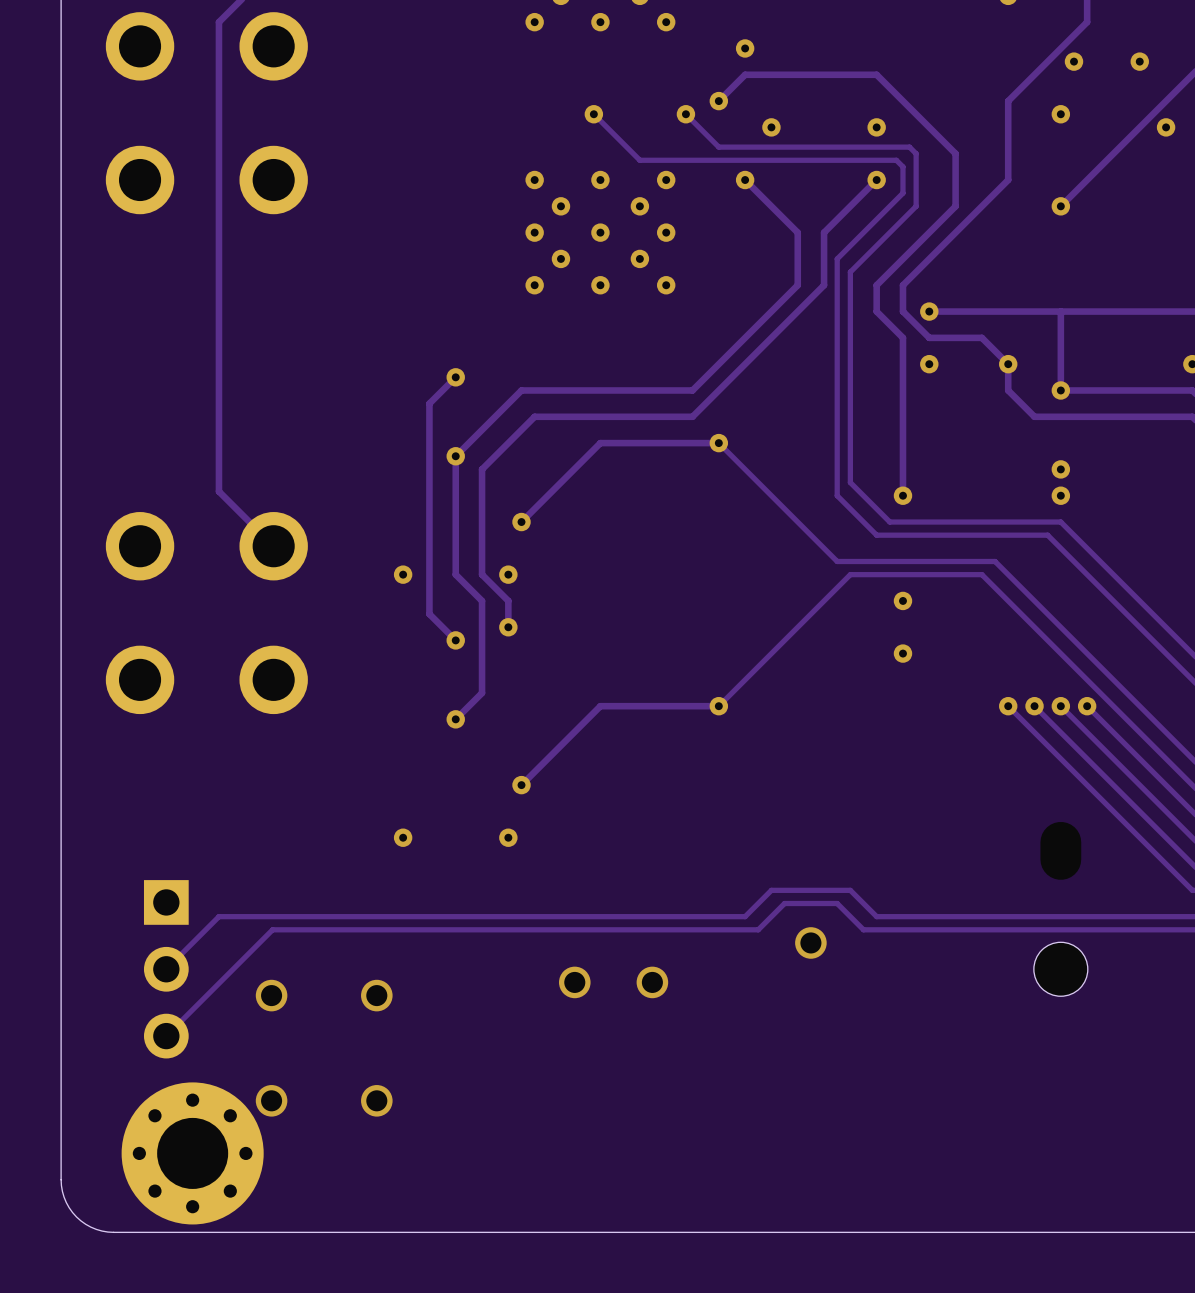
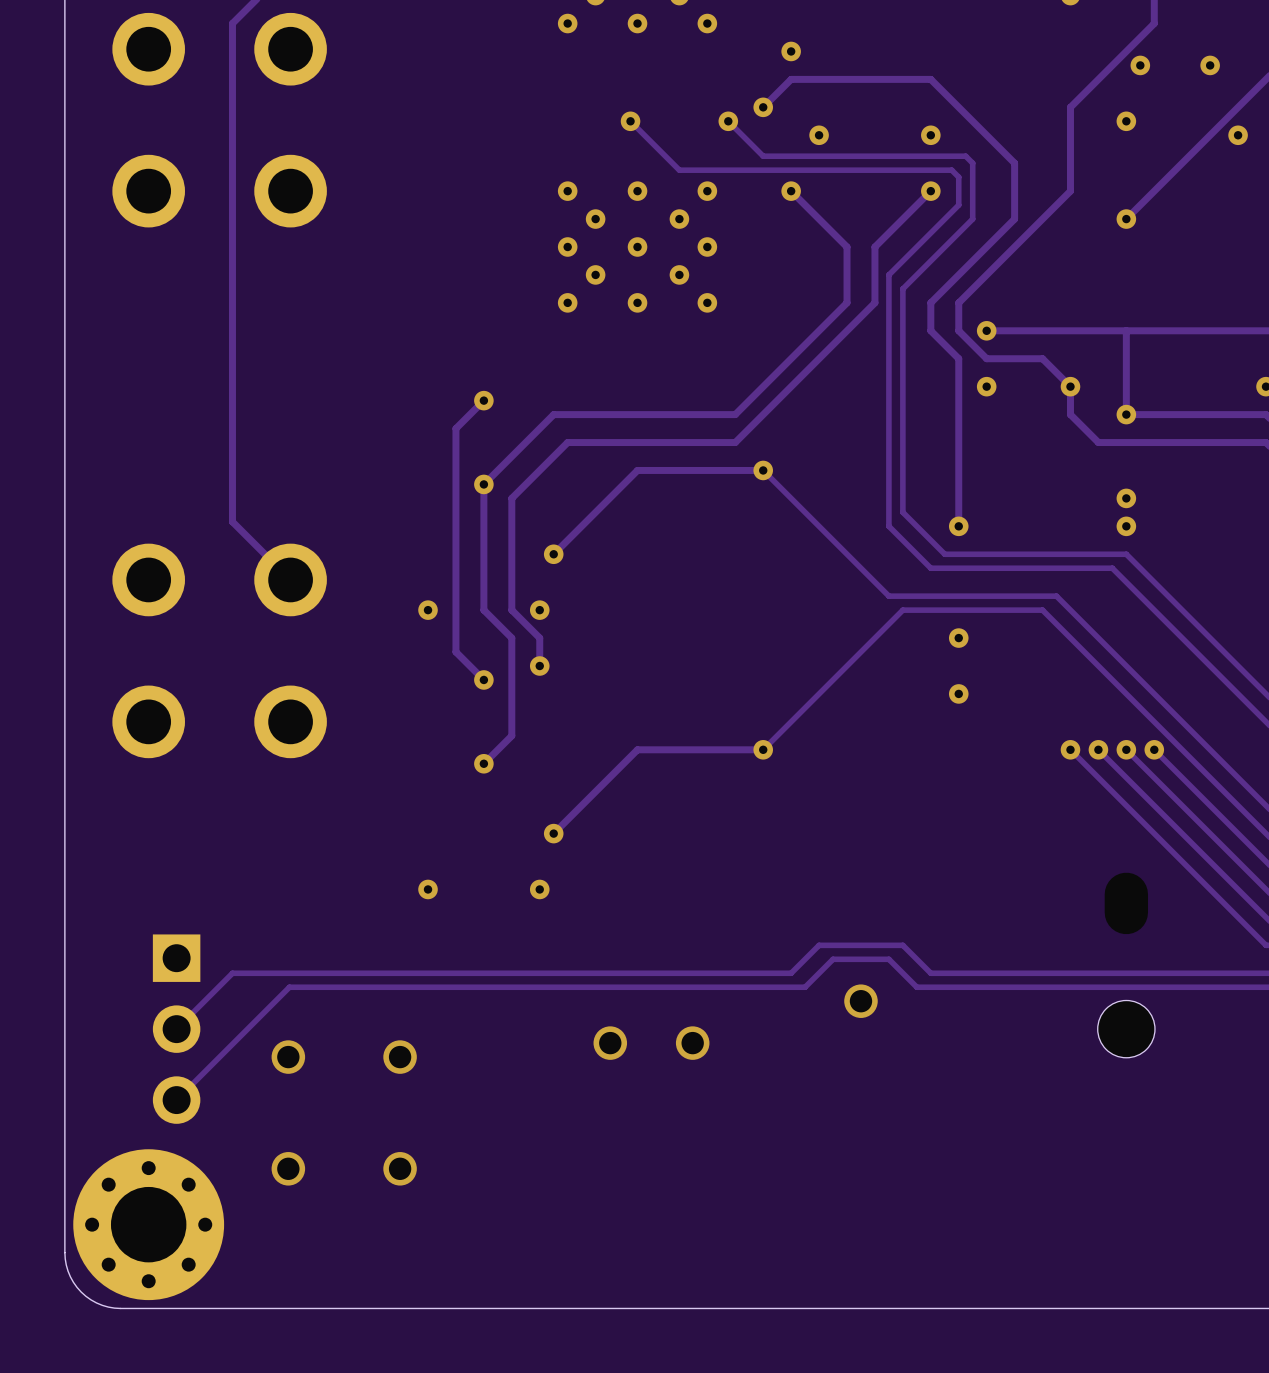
part position: (192, 1153) -> (148, 1224)

